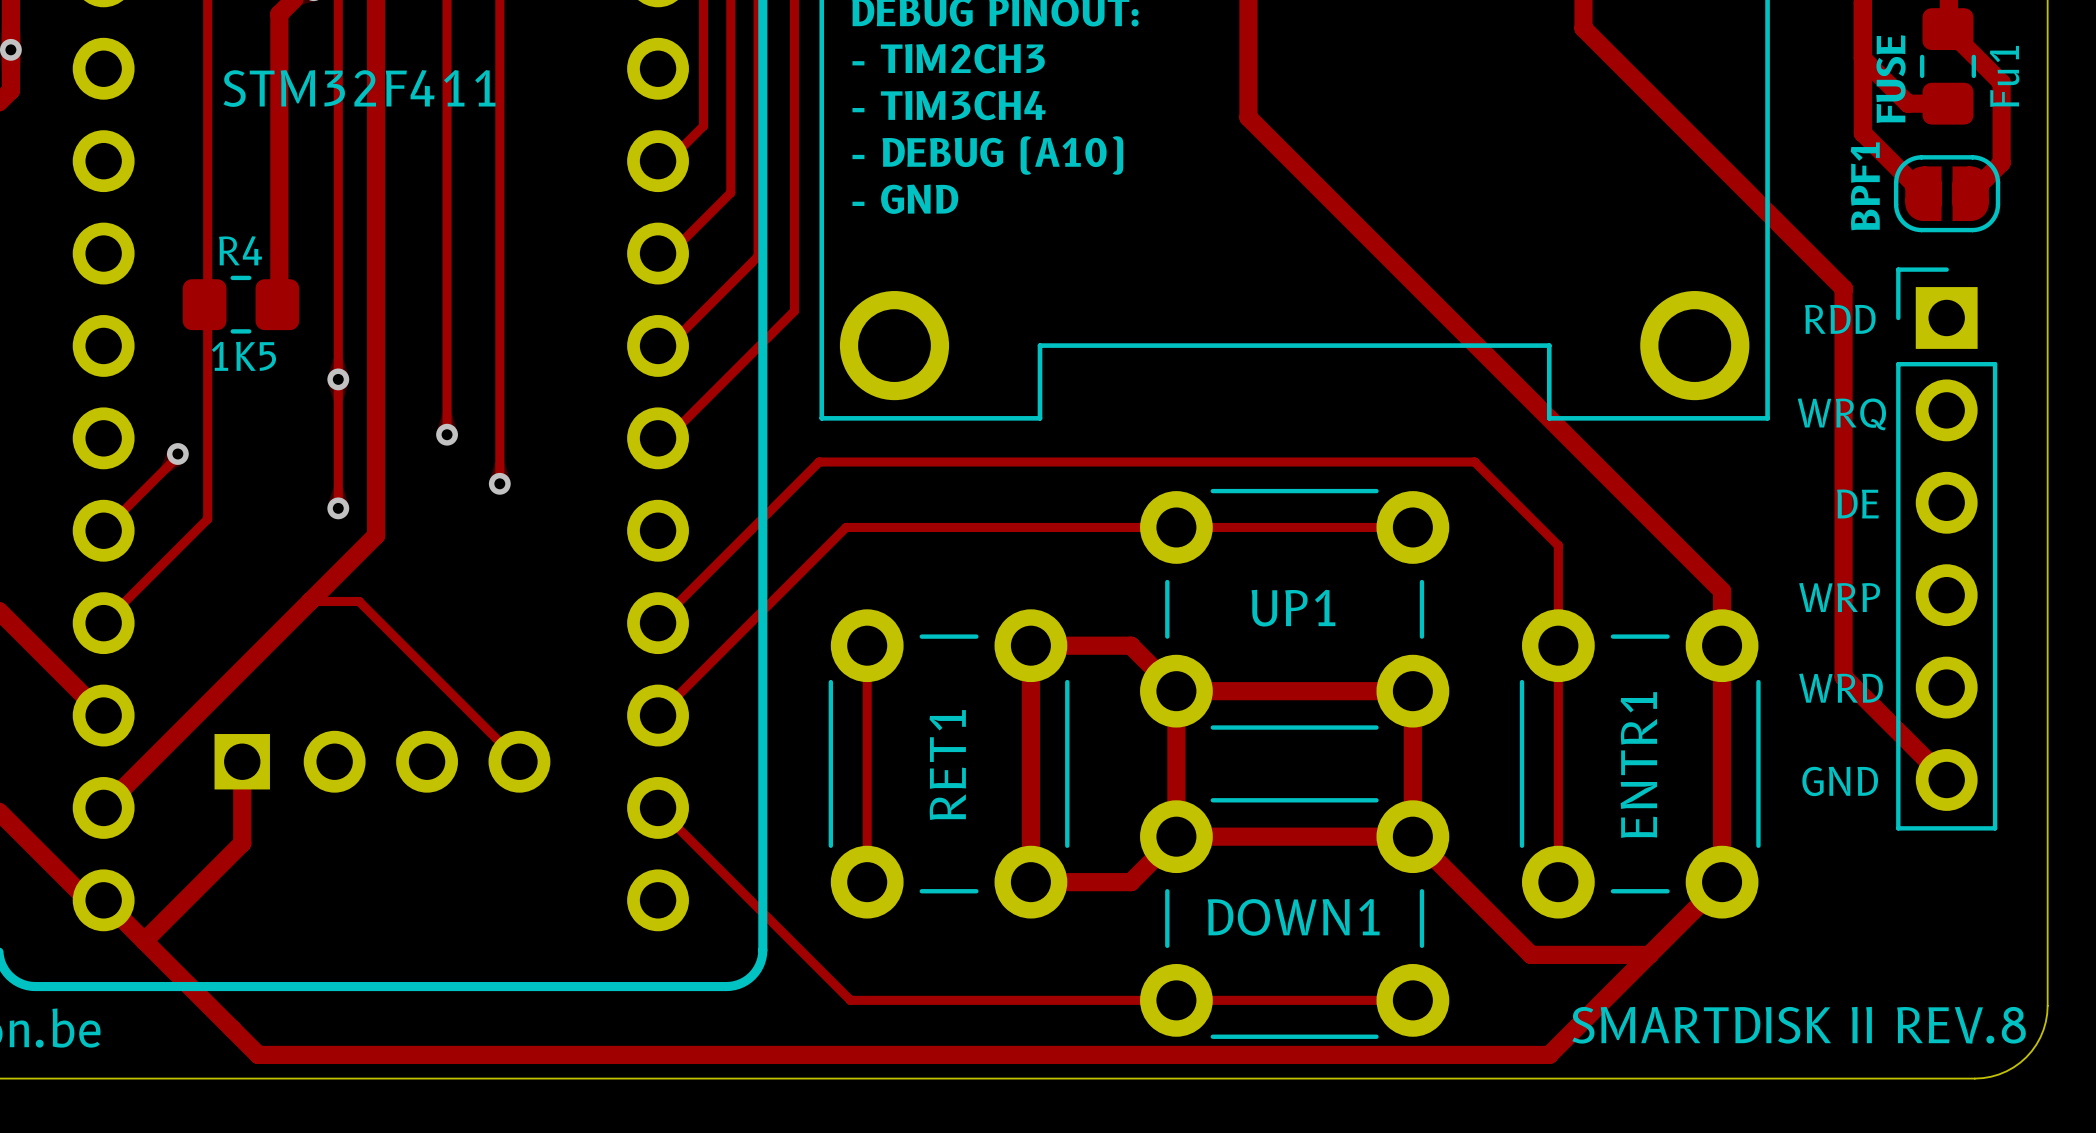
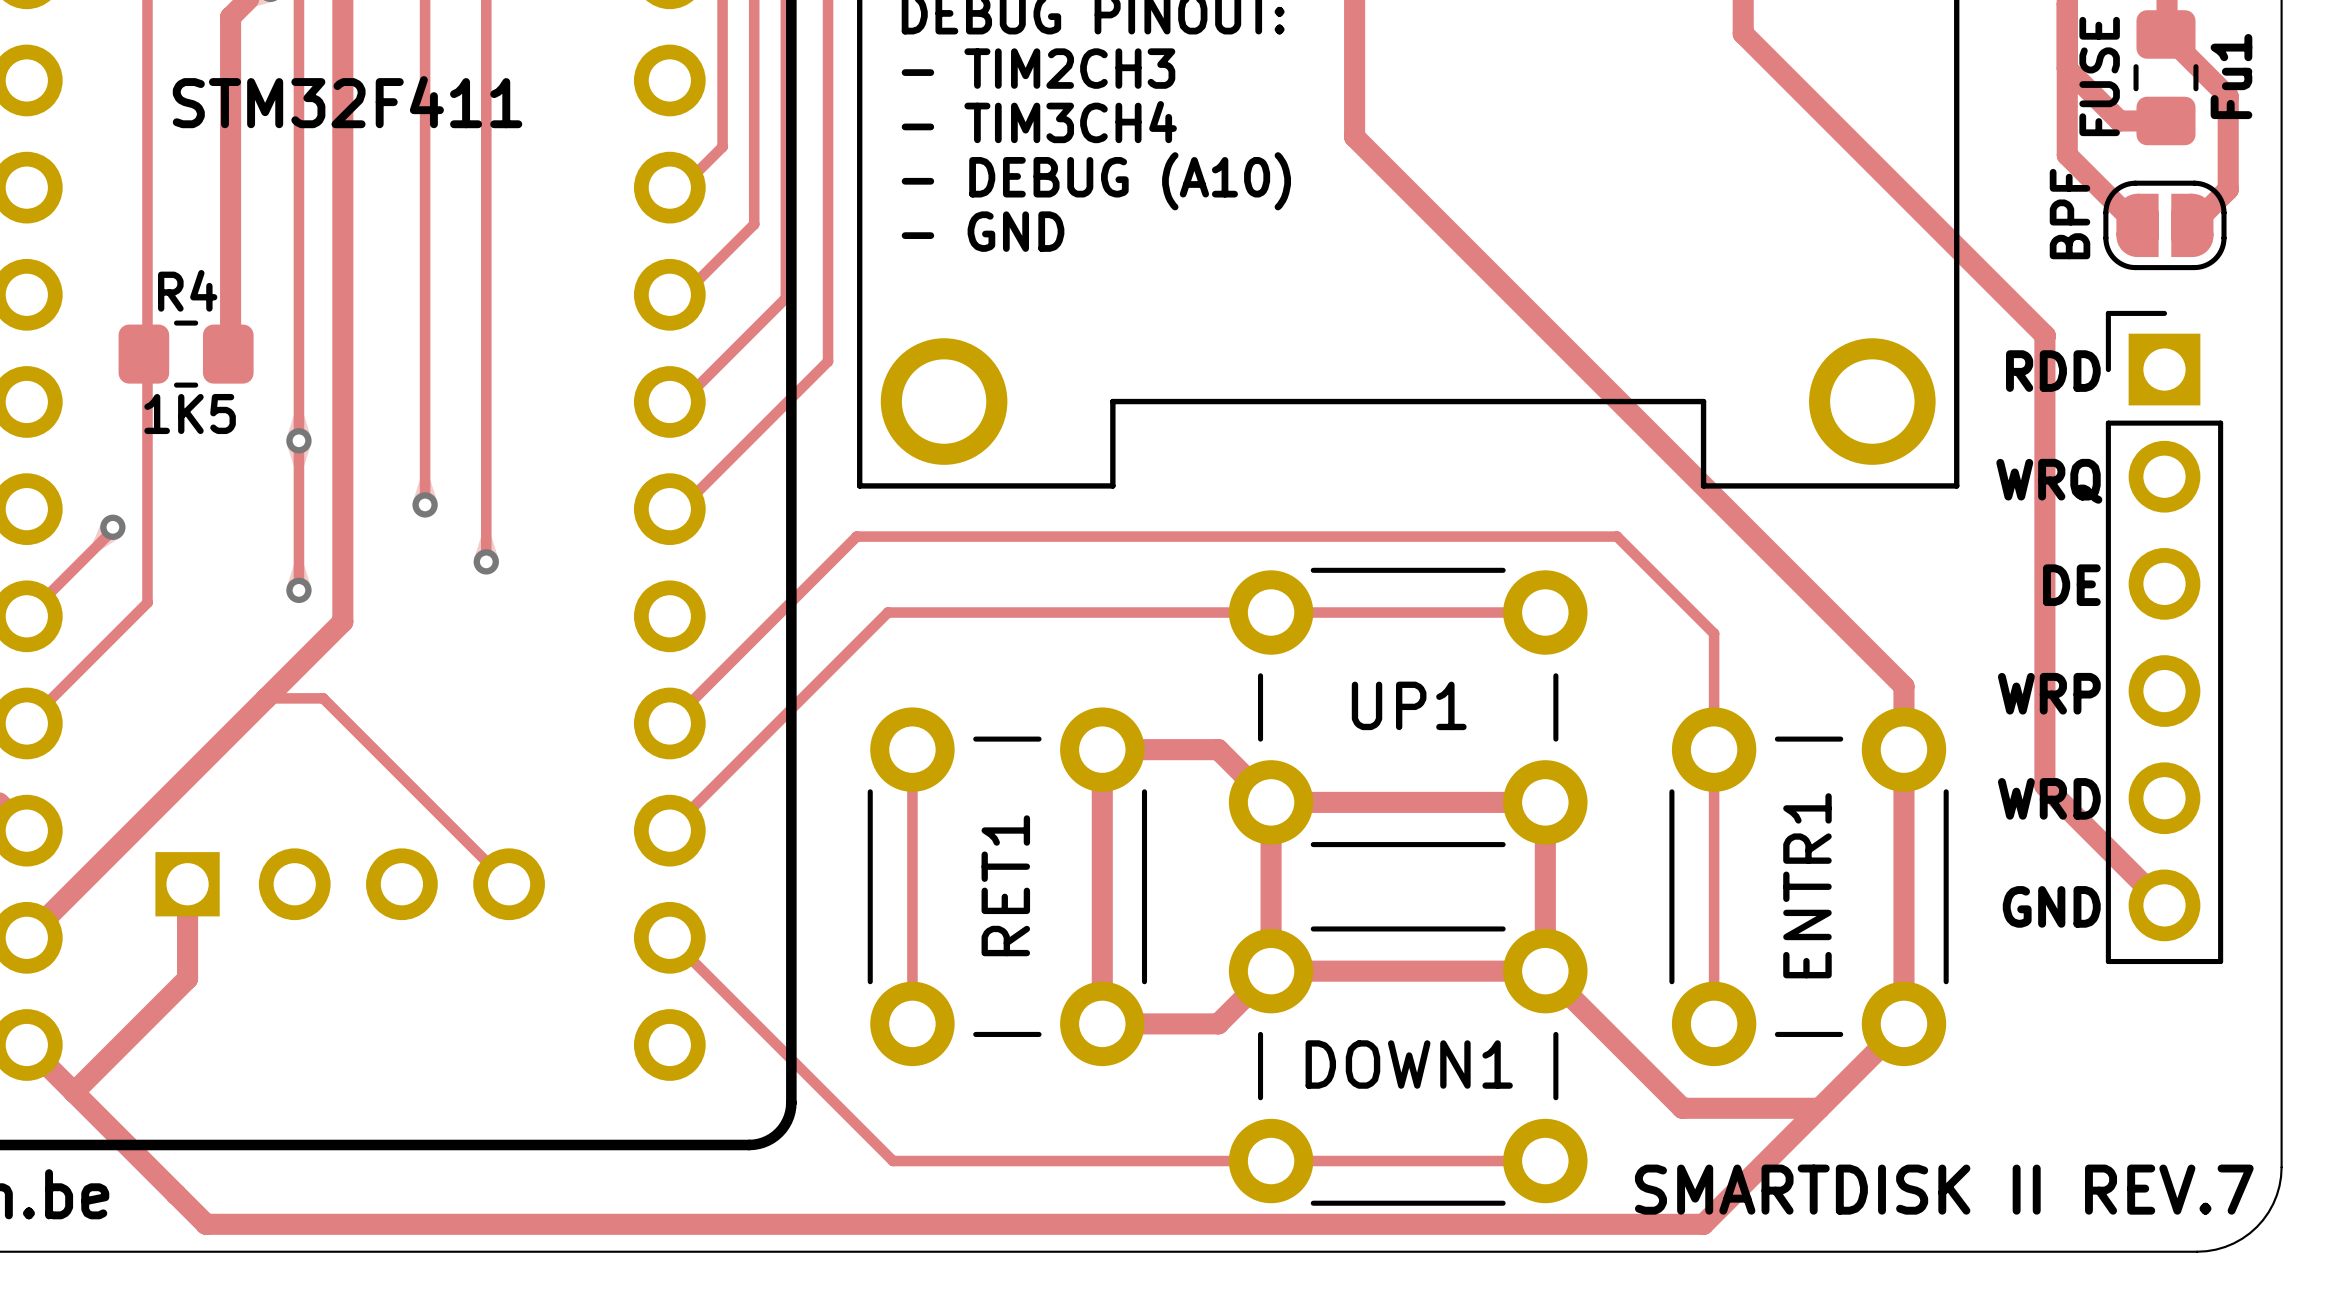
BPF1 name: BPF1 (1865, 186) -> BPF (2070, 214)
text: SMARTDISK II REV.8 (1799, 1025) -> SMARTDISK II REV.7 (1944, 1189)

